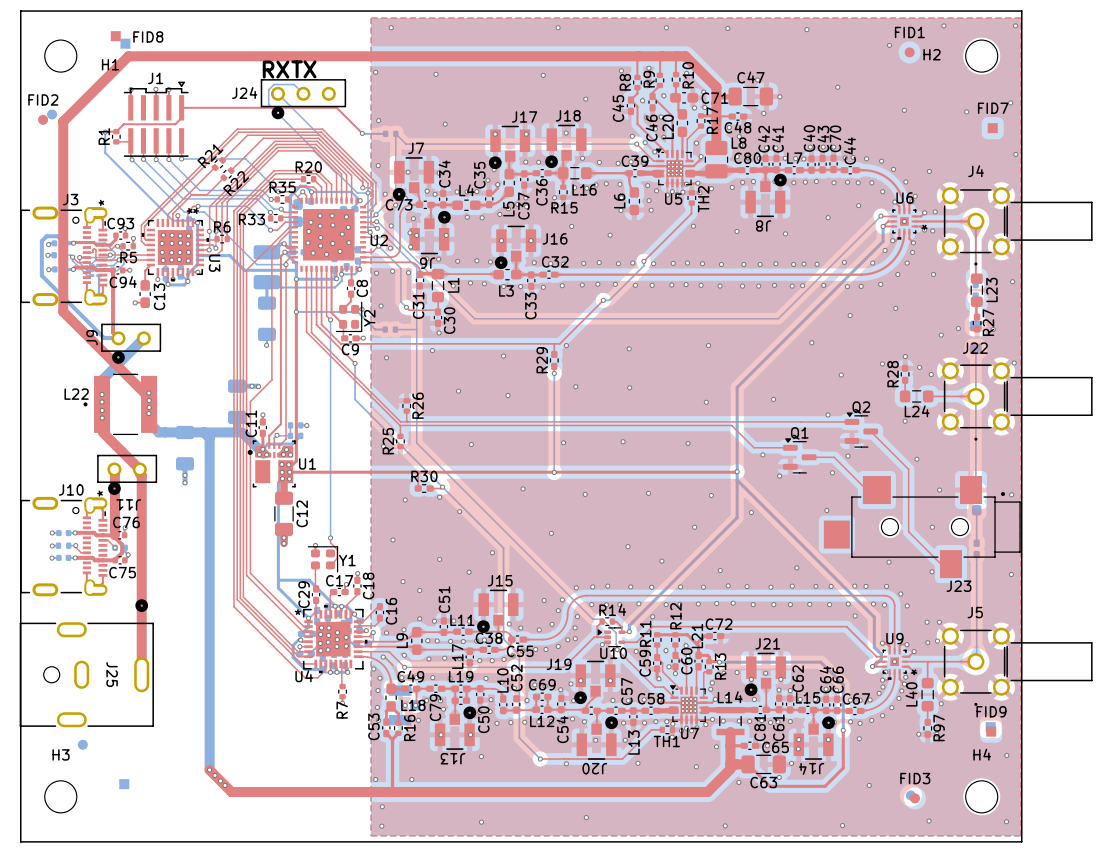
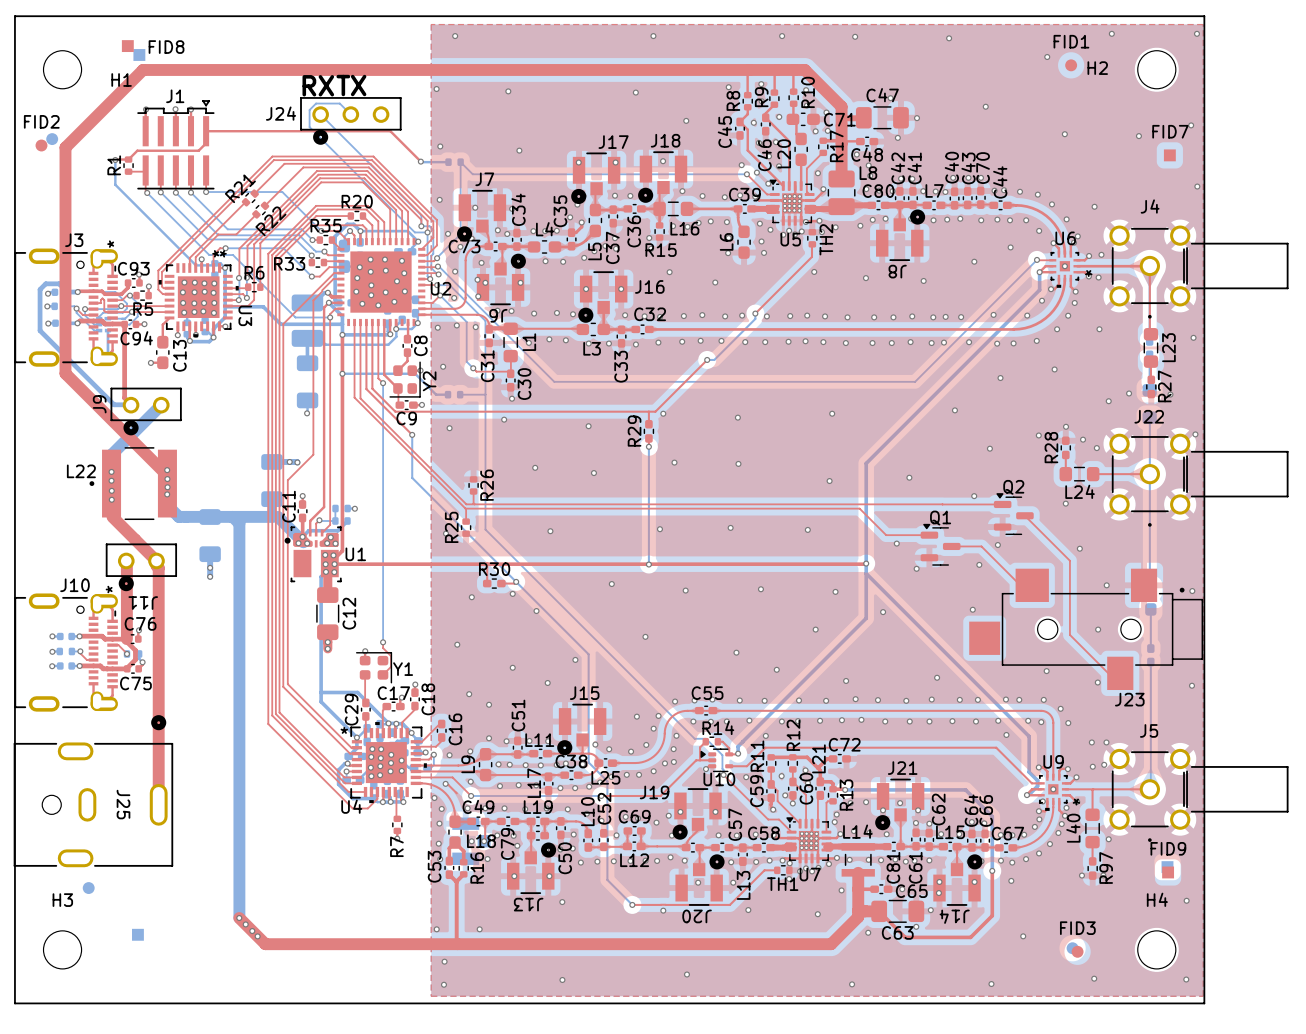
C55 position: (517, 639) -> (706, 710)
L25: none -> (605, 763)
C55 name position: C55 (520, 651) -> C55 (707, 693)
C54: (561, 704) -> none

